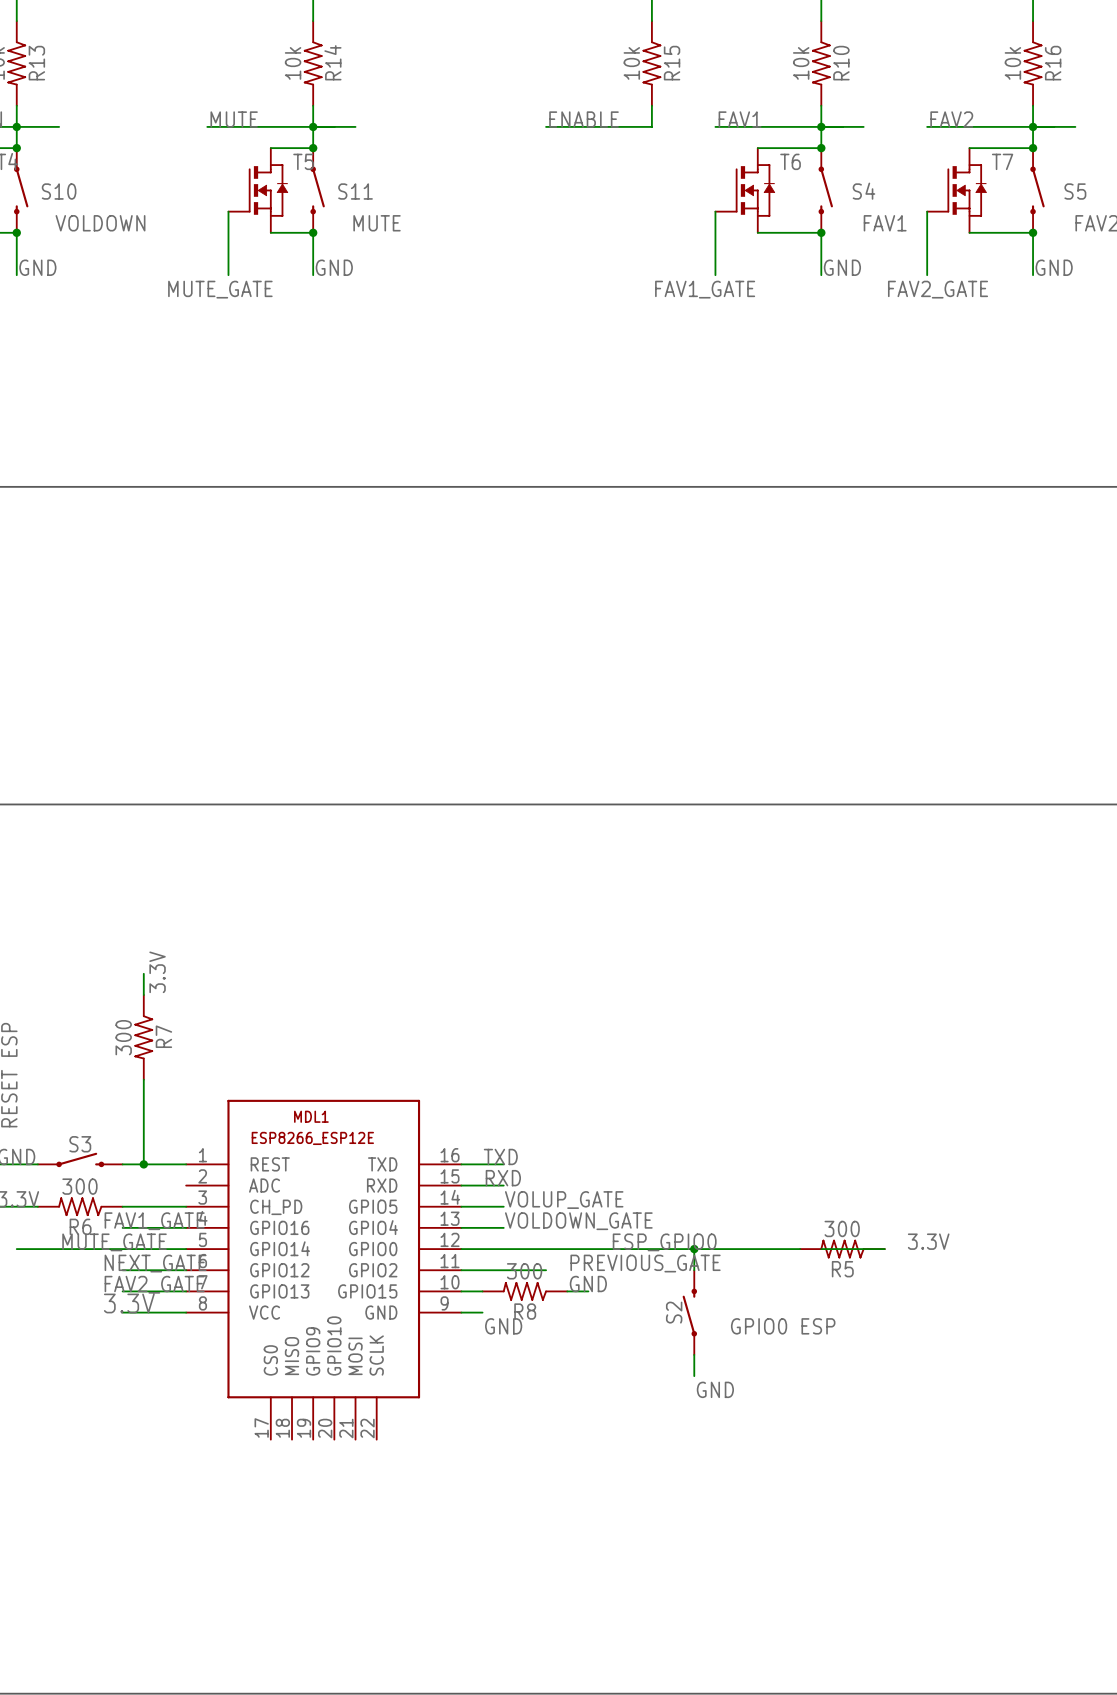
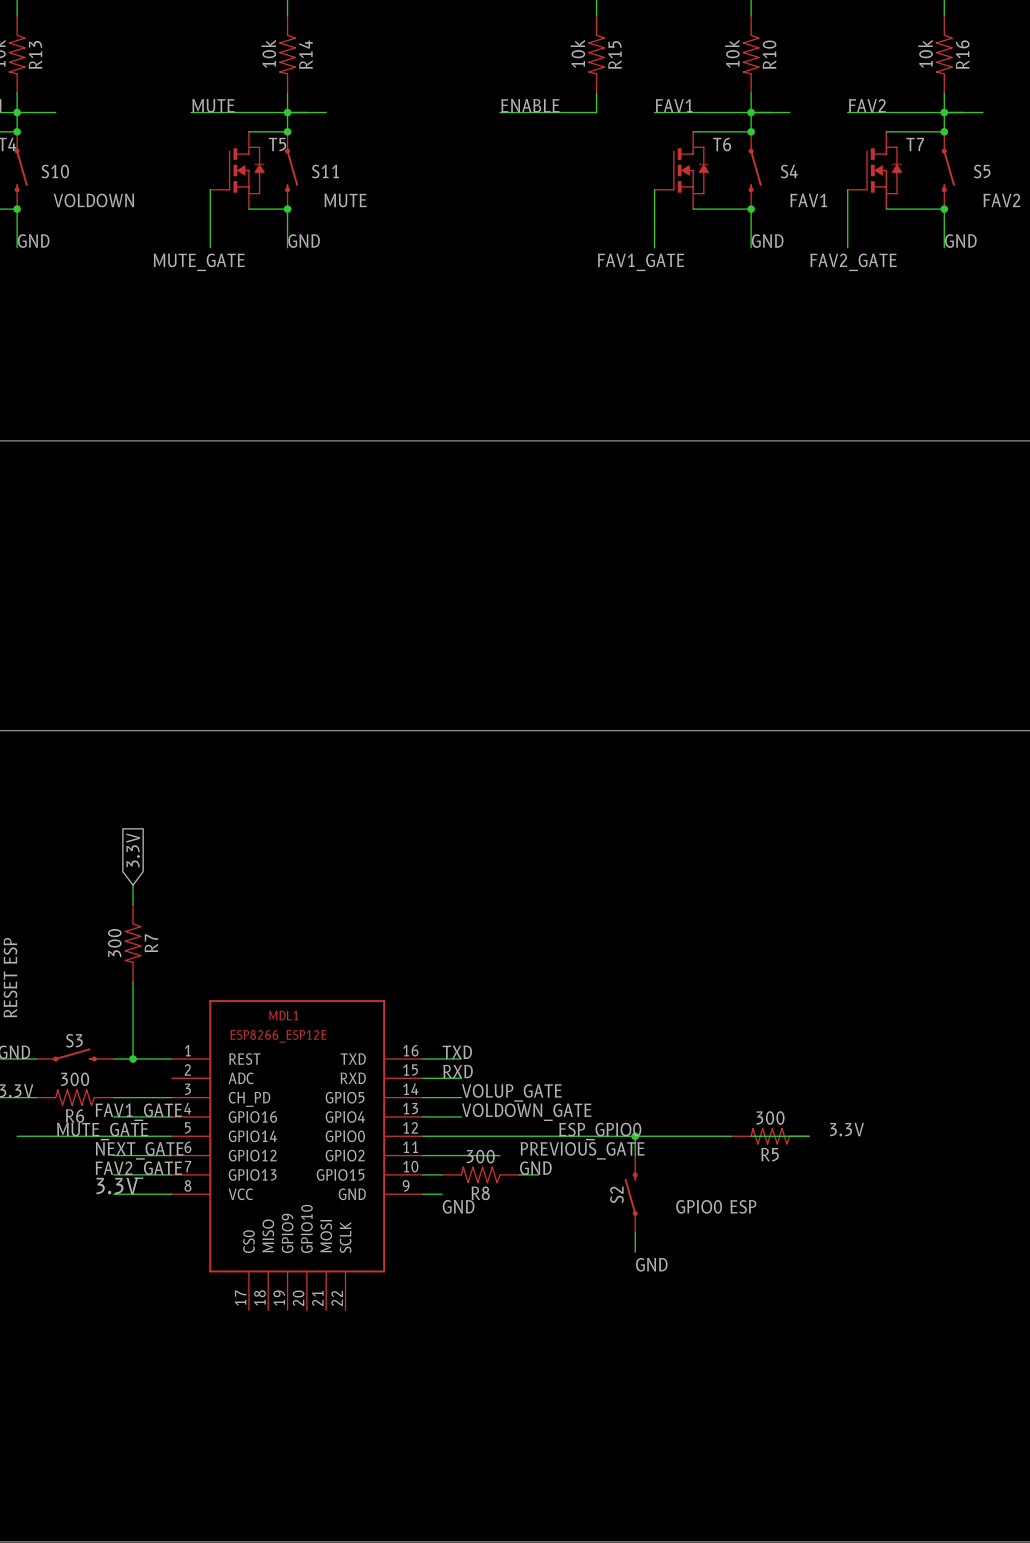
global label: none -> 3.3V (133, 850)
label: 3.3V (157, 972) -> none

